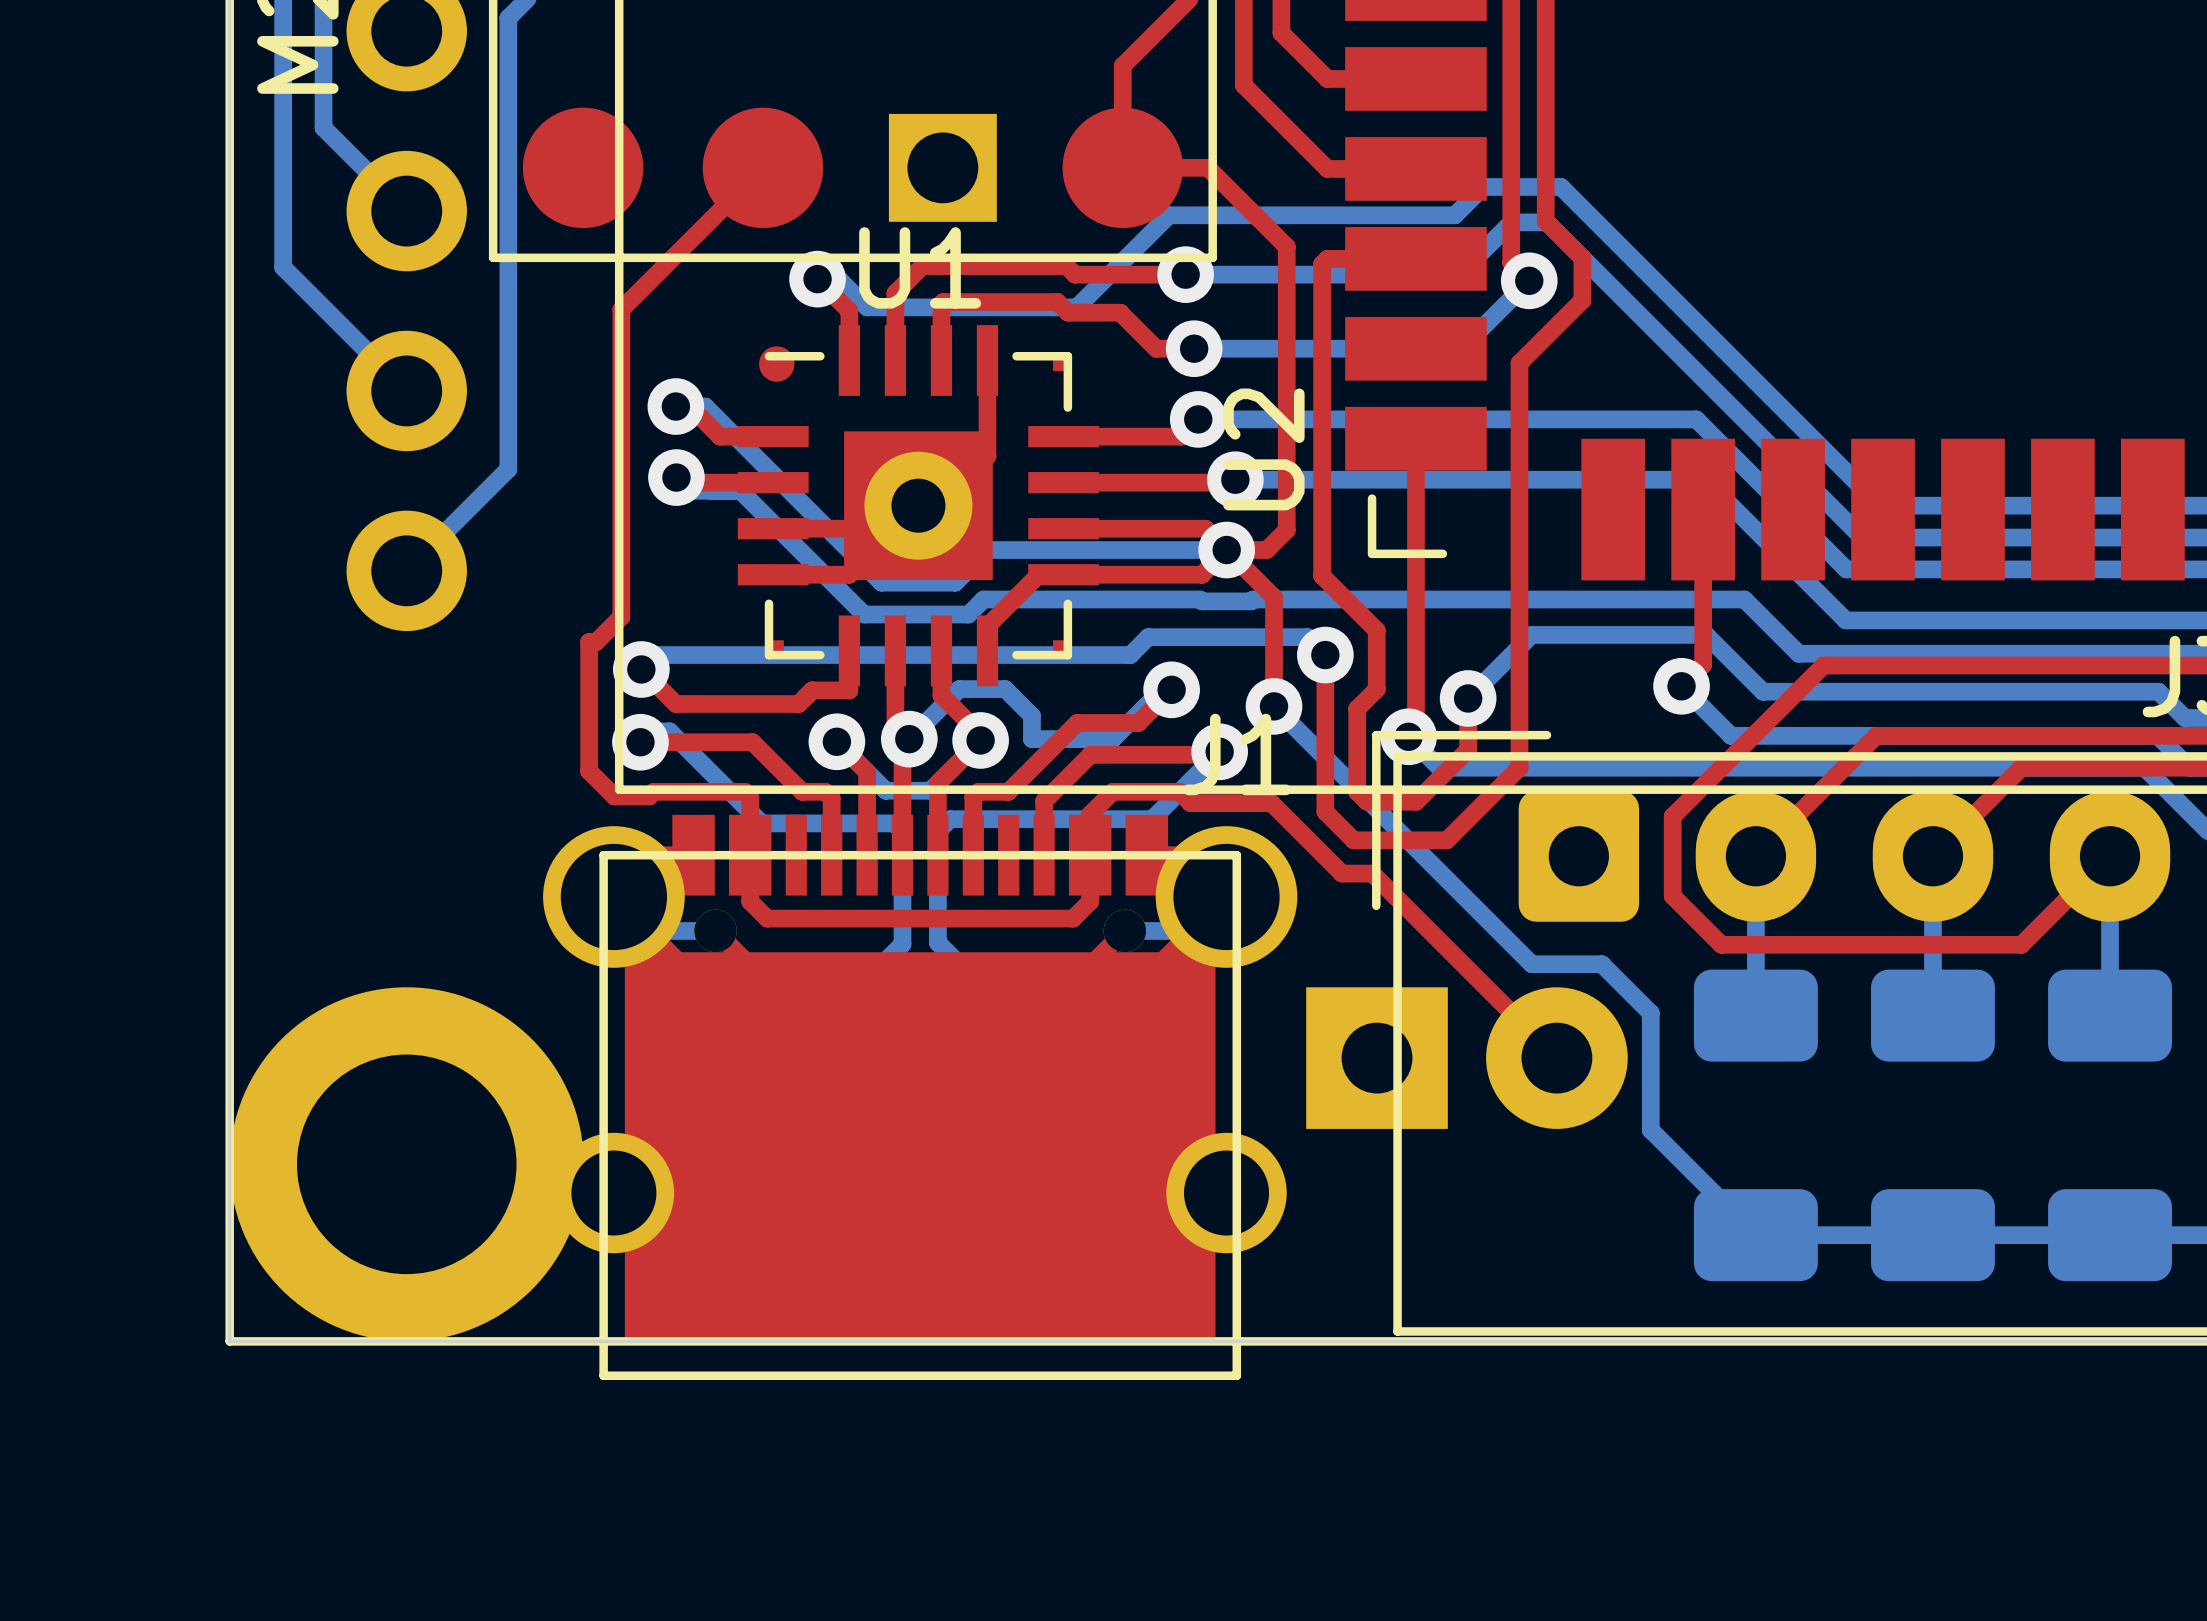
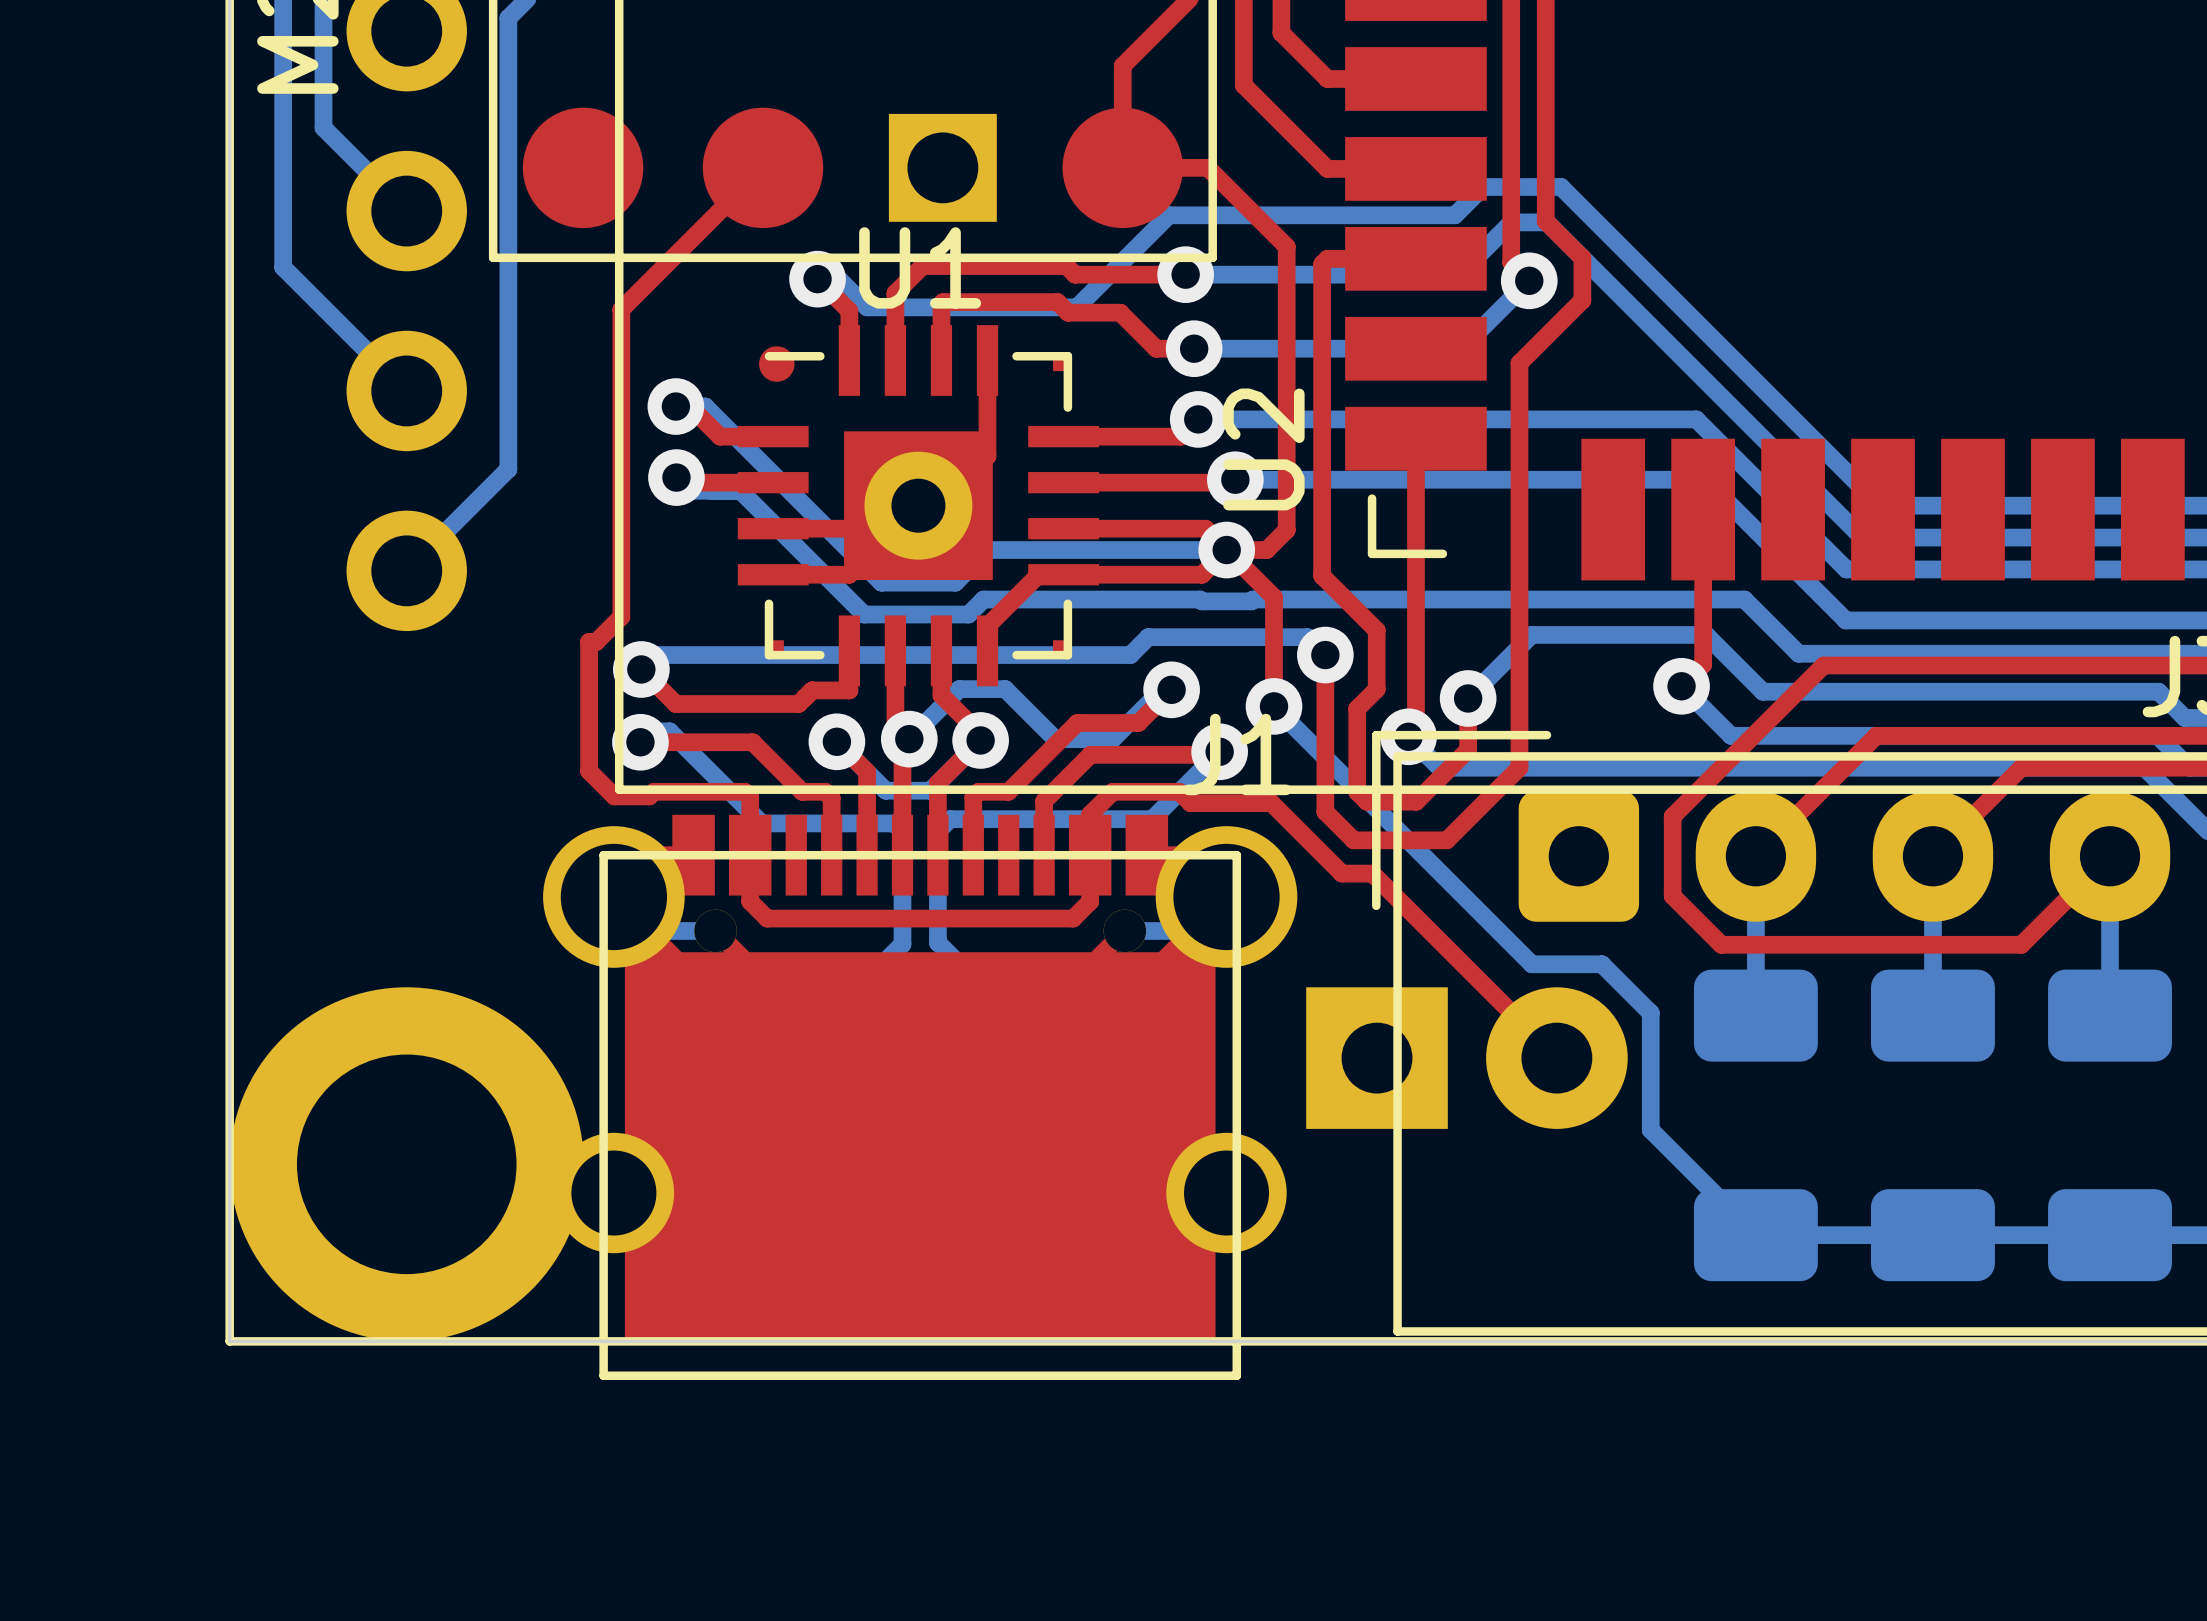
bottom track: (1031, 715) (1031, 739) (1055, 739) -> (1031, 715) (1055, 739)

